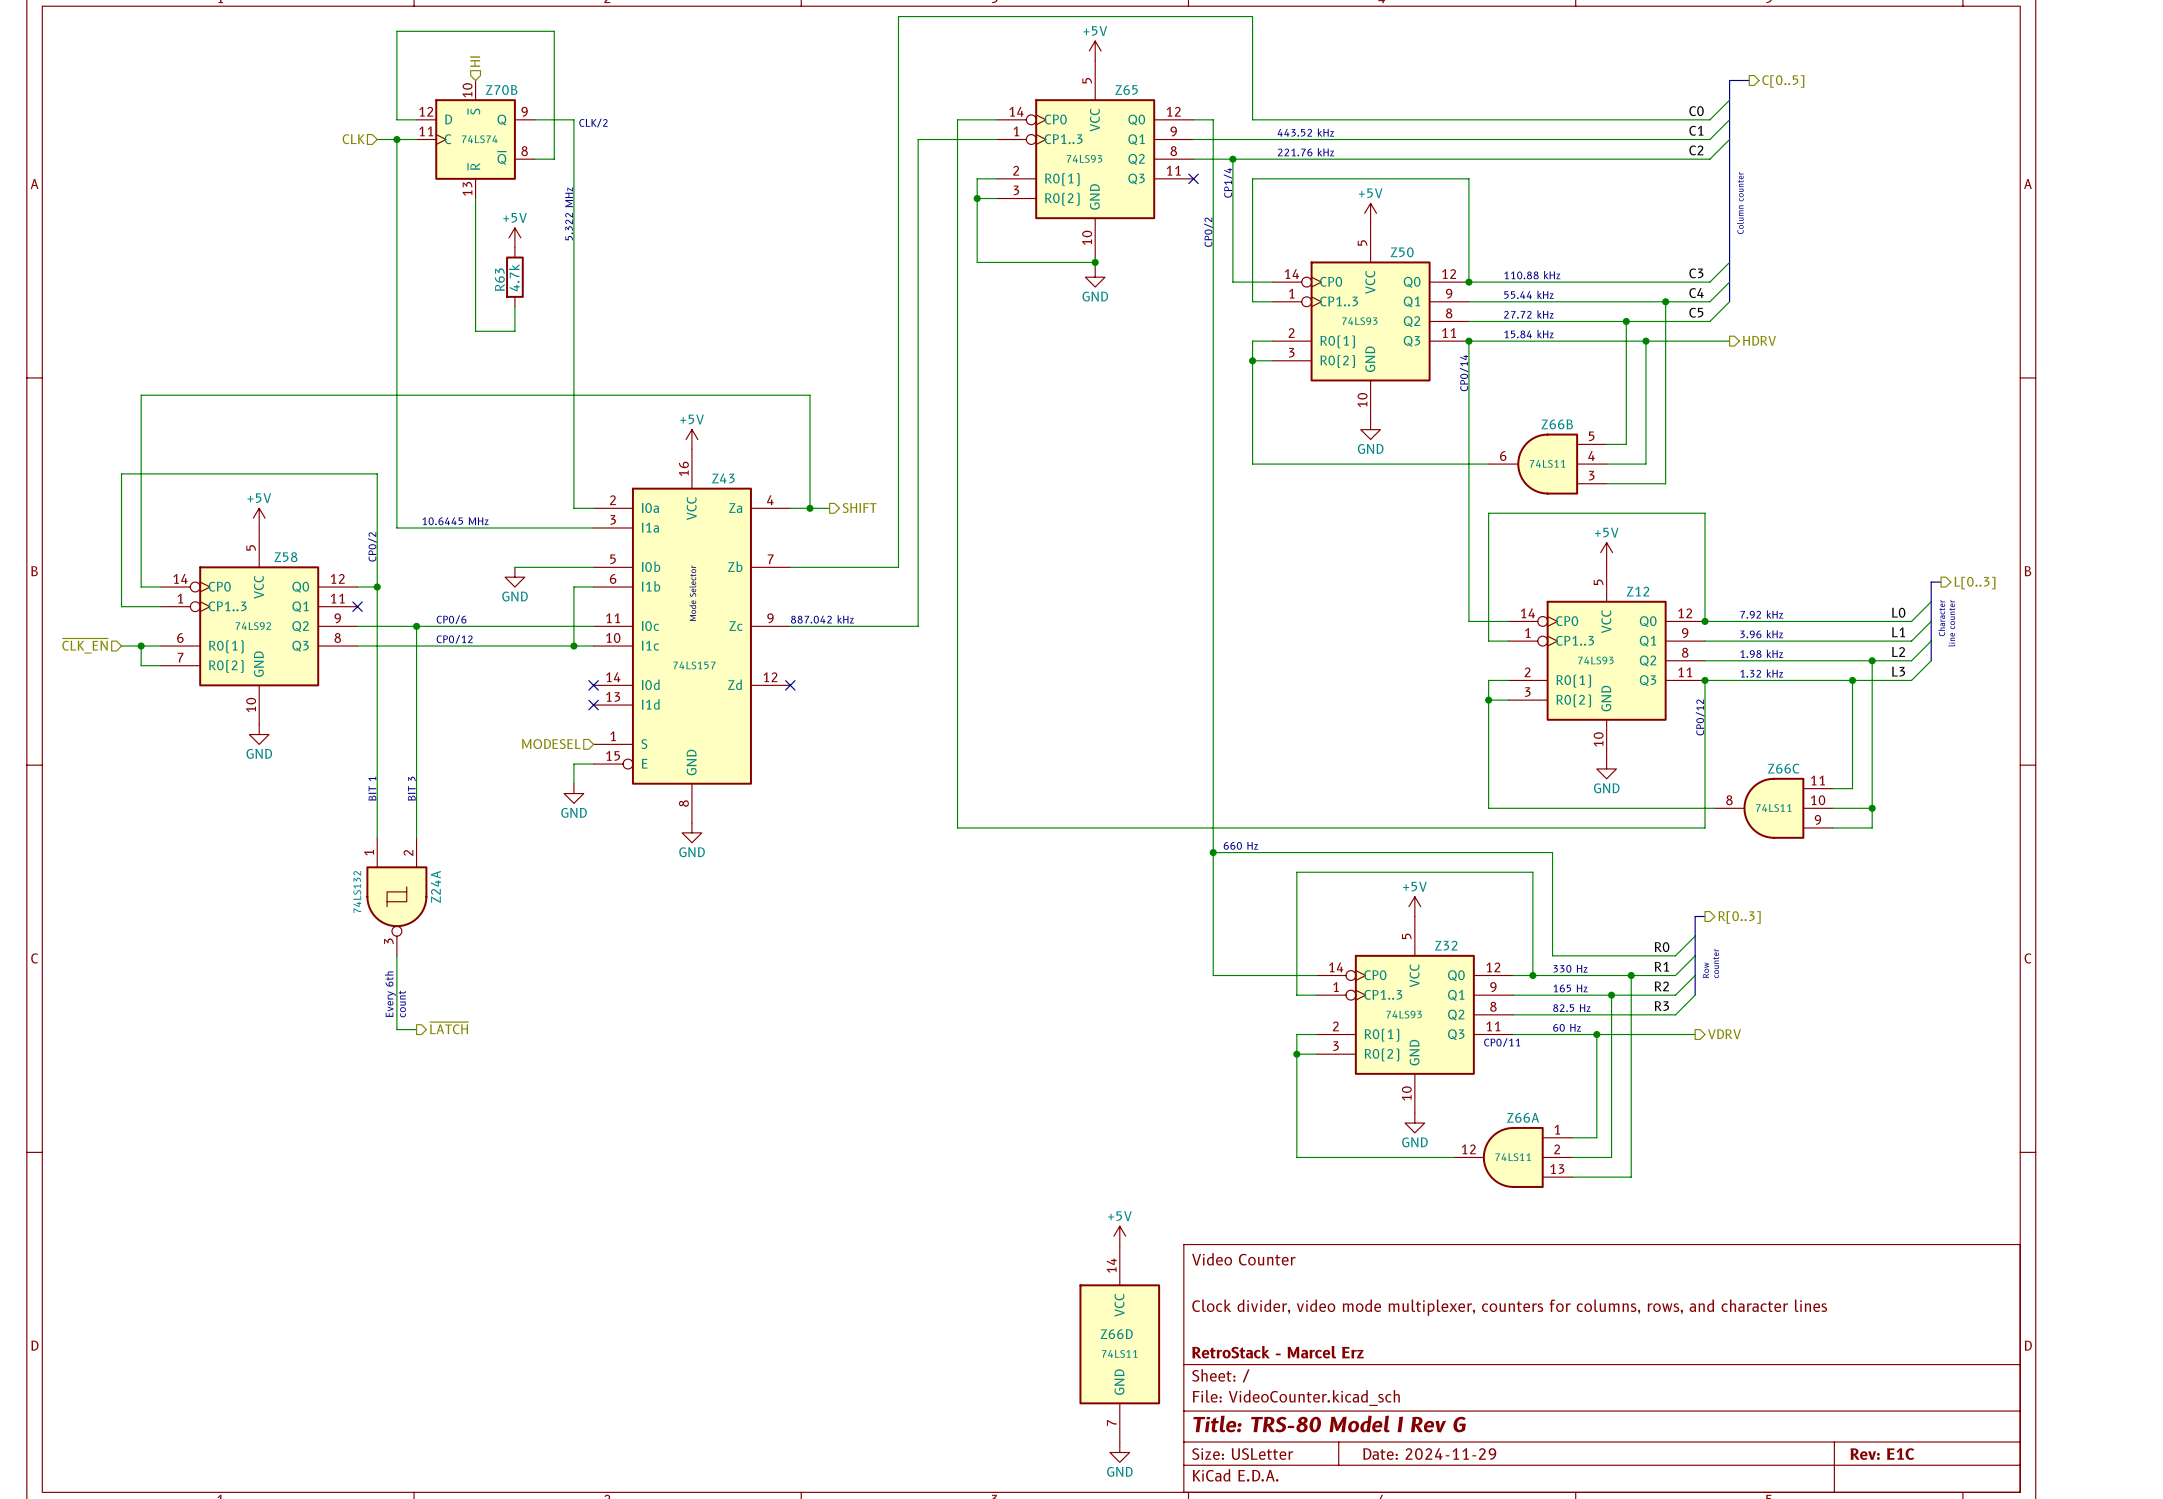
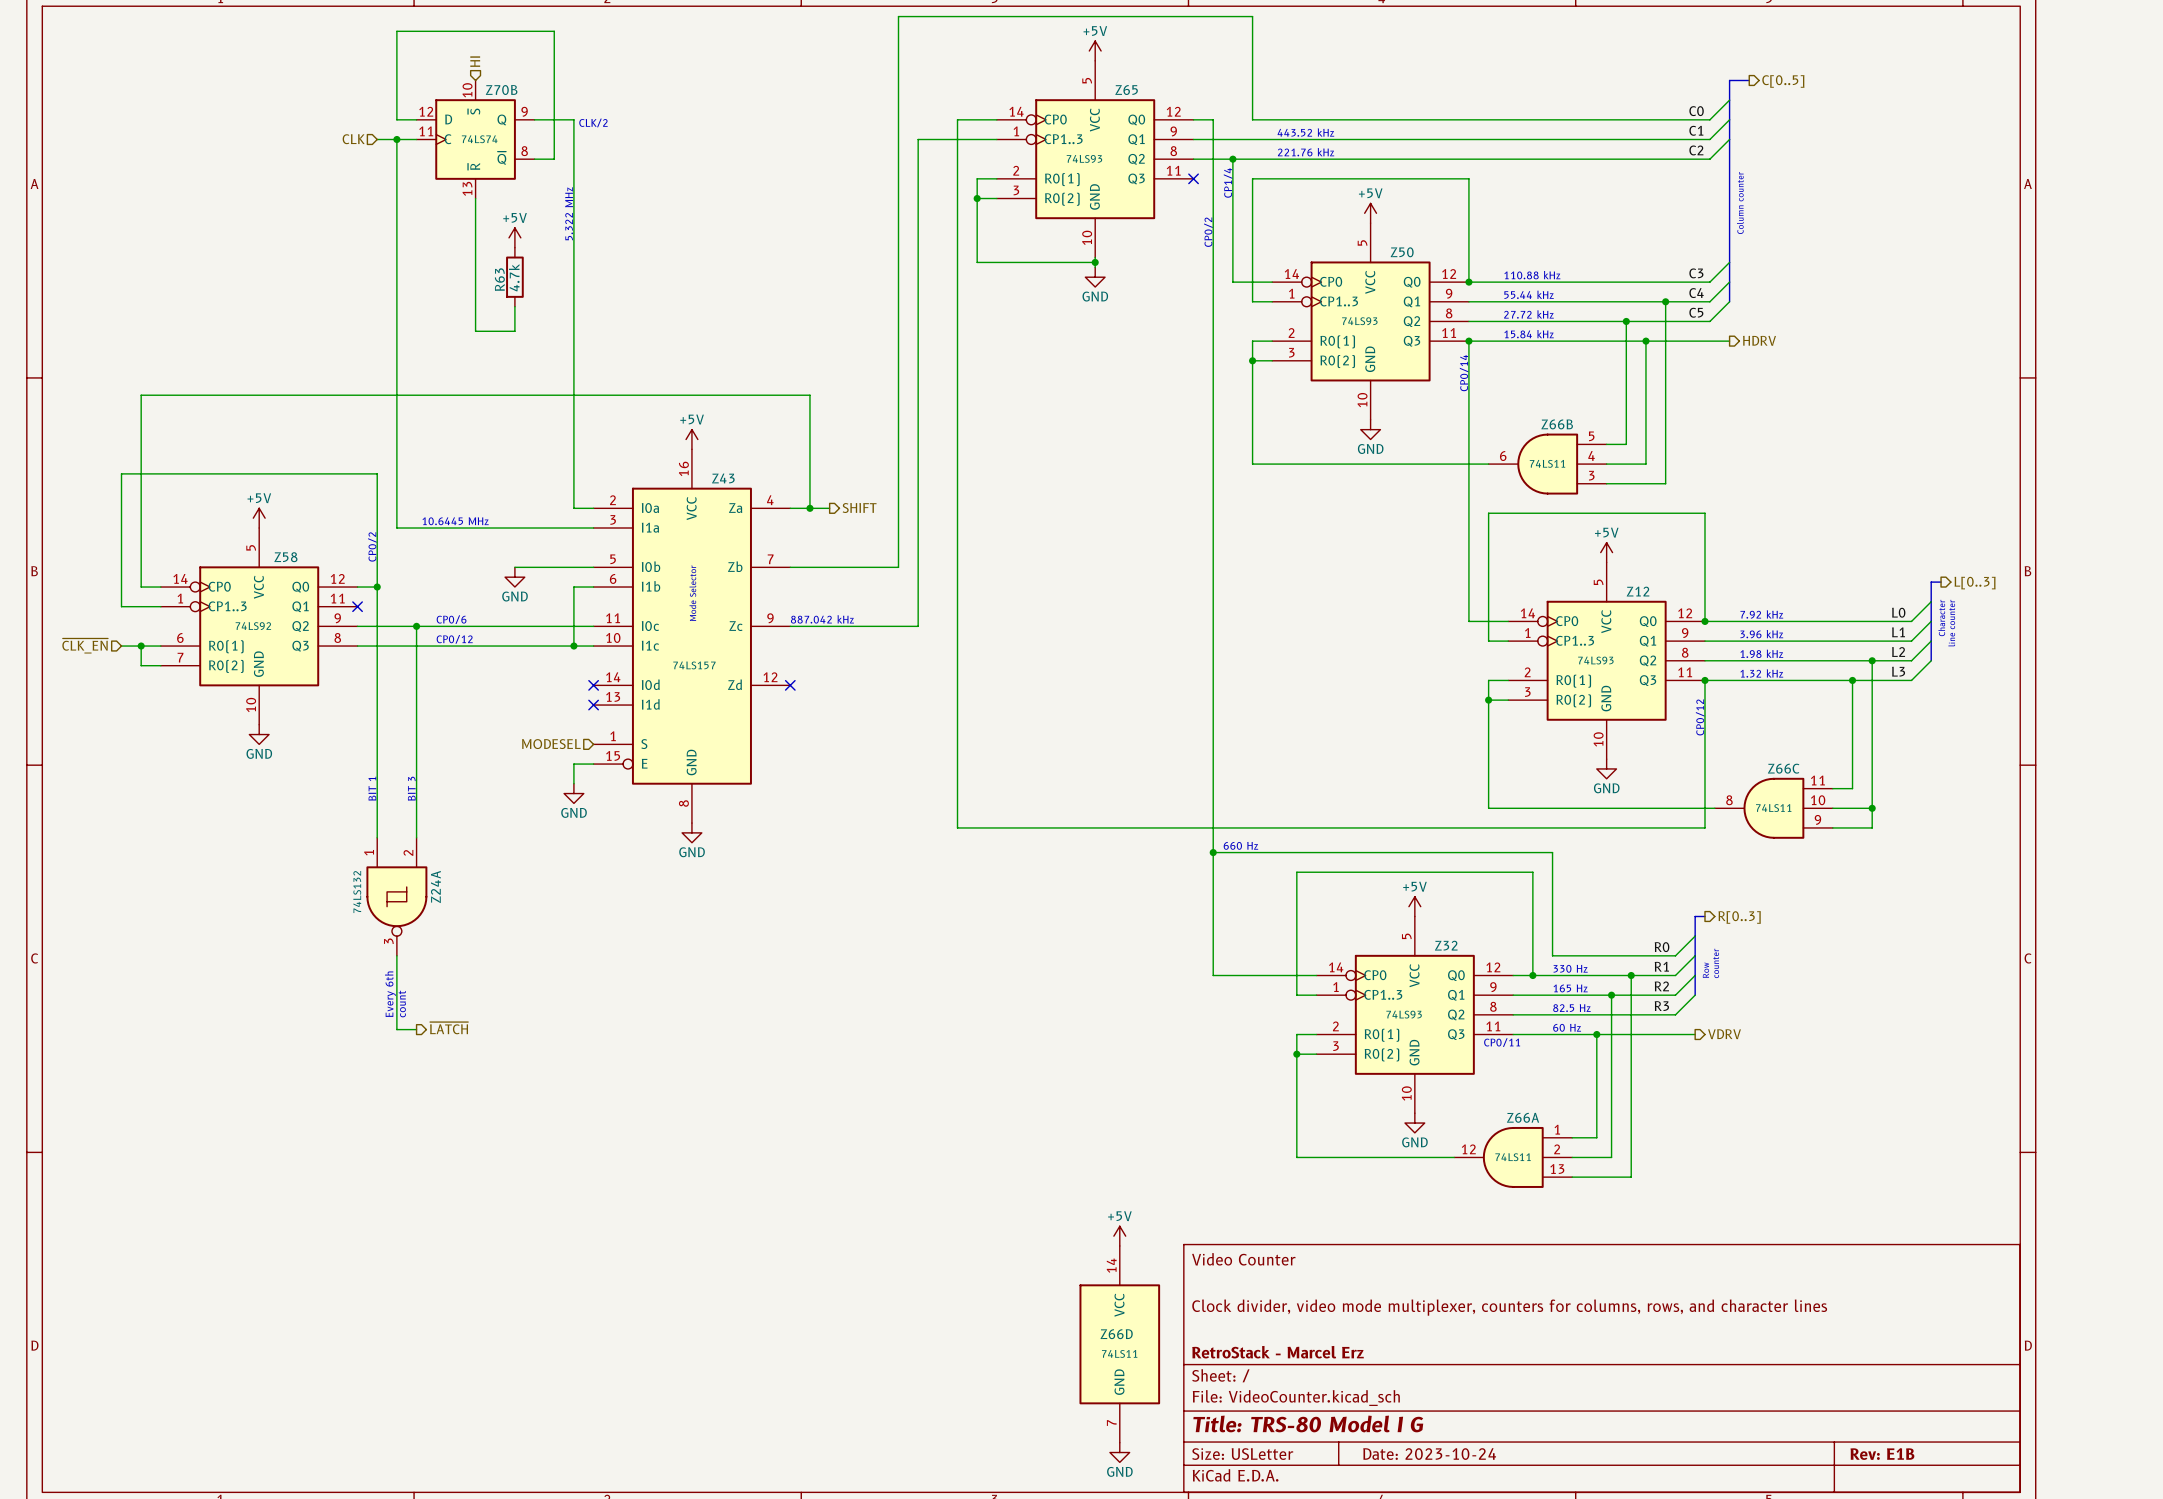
title block: Title: TRS-80 Model I Rev G (1329, 1424) -> Title: TRS-80 Model I G (1308, 1423)
title block: Date: 2024-11-29 (1429, 1454) -> Date: 2023-10-24 (1429, 1454)
title block: Rev: E1C (1882, 1454) -> Rev: E1B (1882, 1454)

